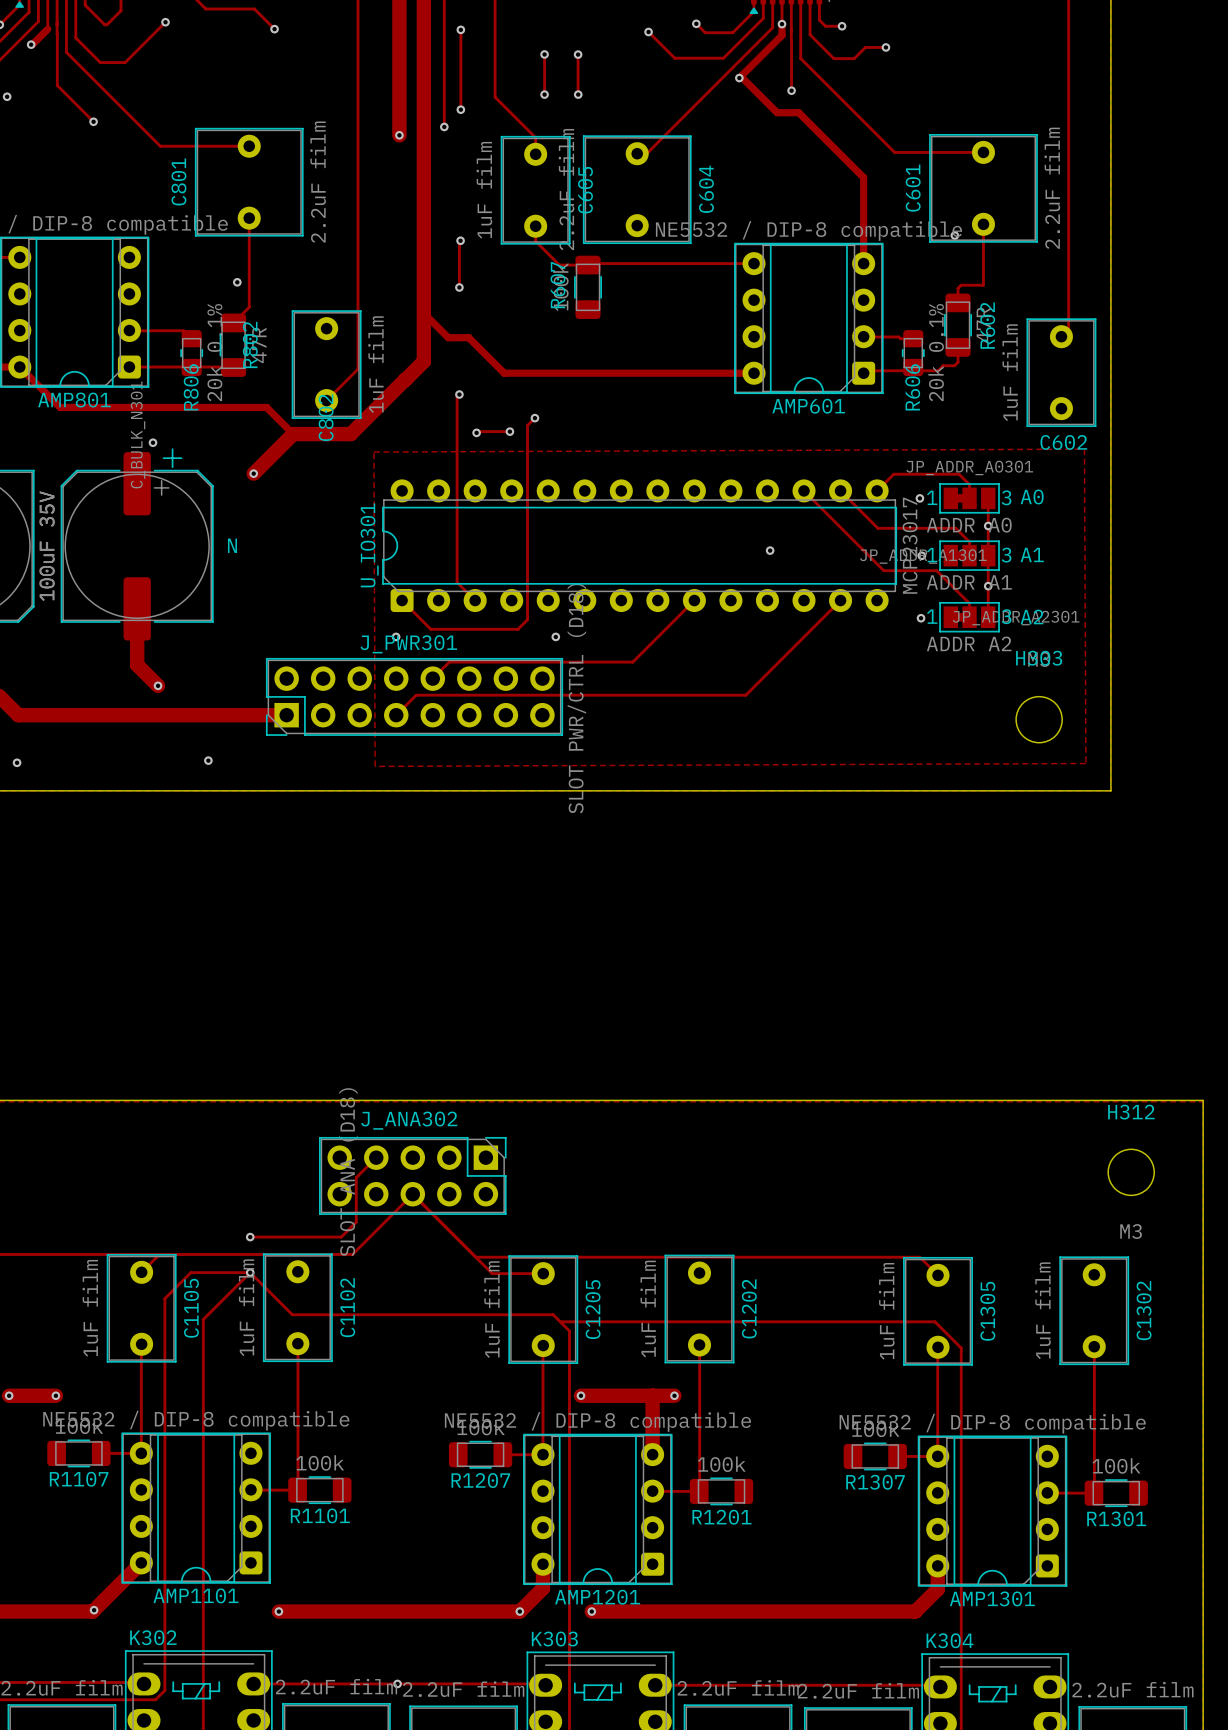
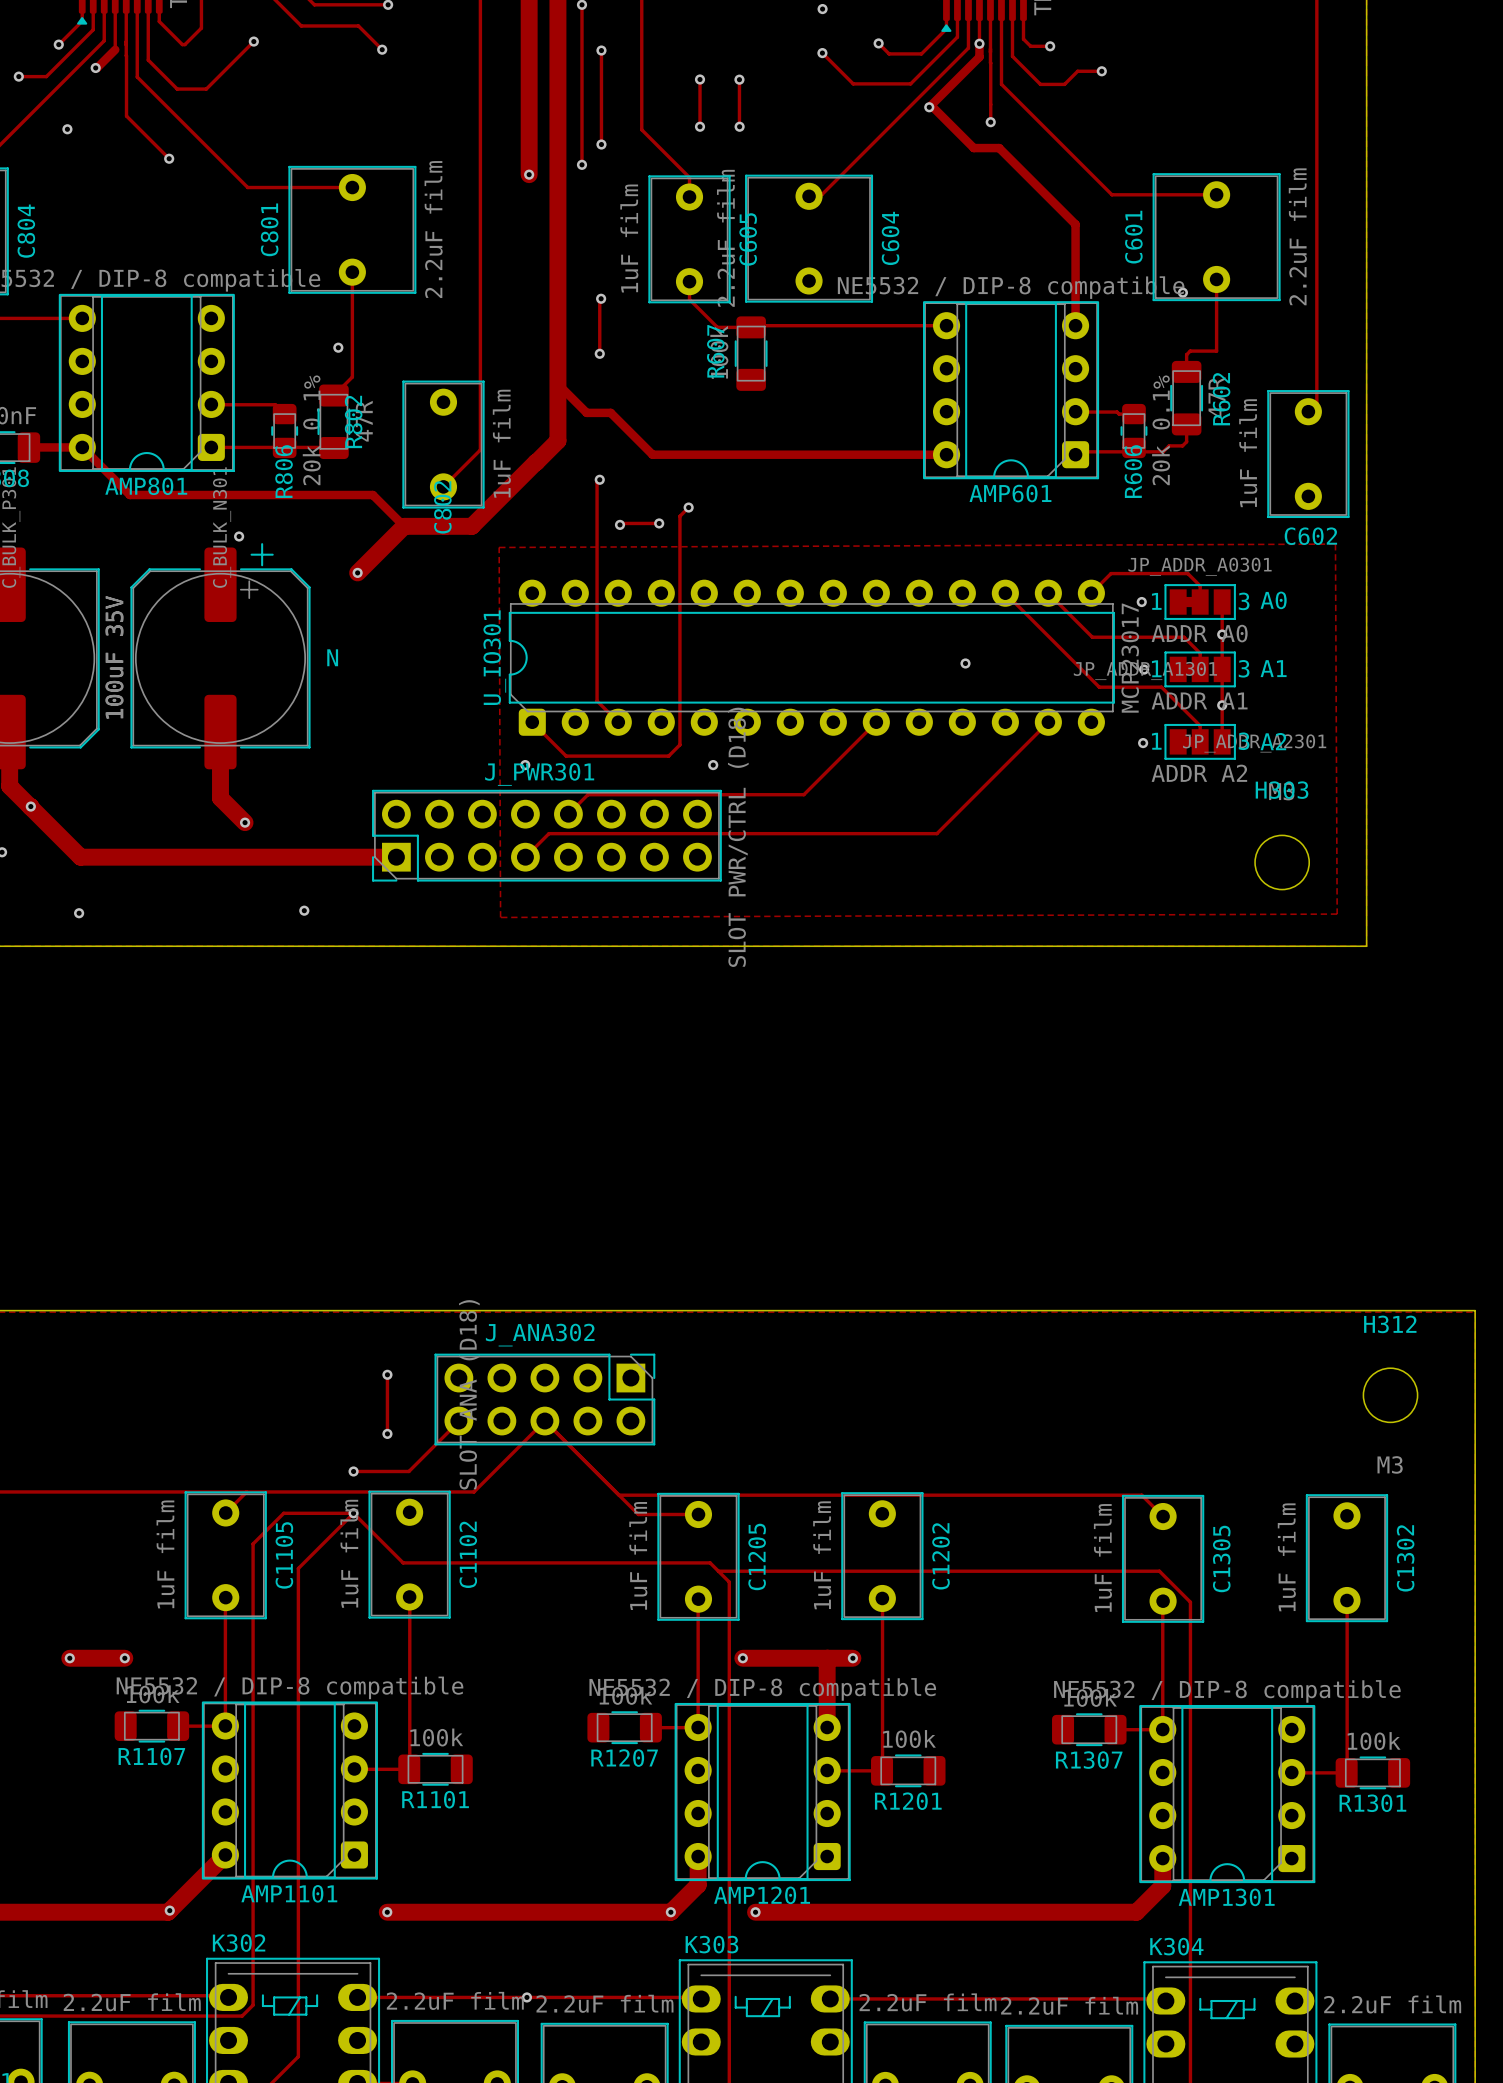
track: none -> (387, 1374) (387, 1433)
via: none -> (387, 1374)
track: (376, 1157) (356, 1177) (356, 1222) (341, 1237) (297, 1237) -> (458, 1421) (408, 1471)
via: none -> (387, 1433)

